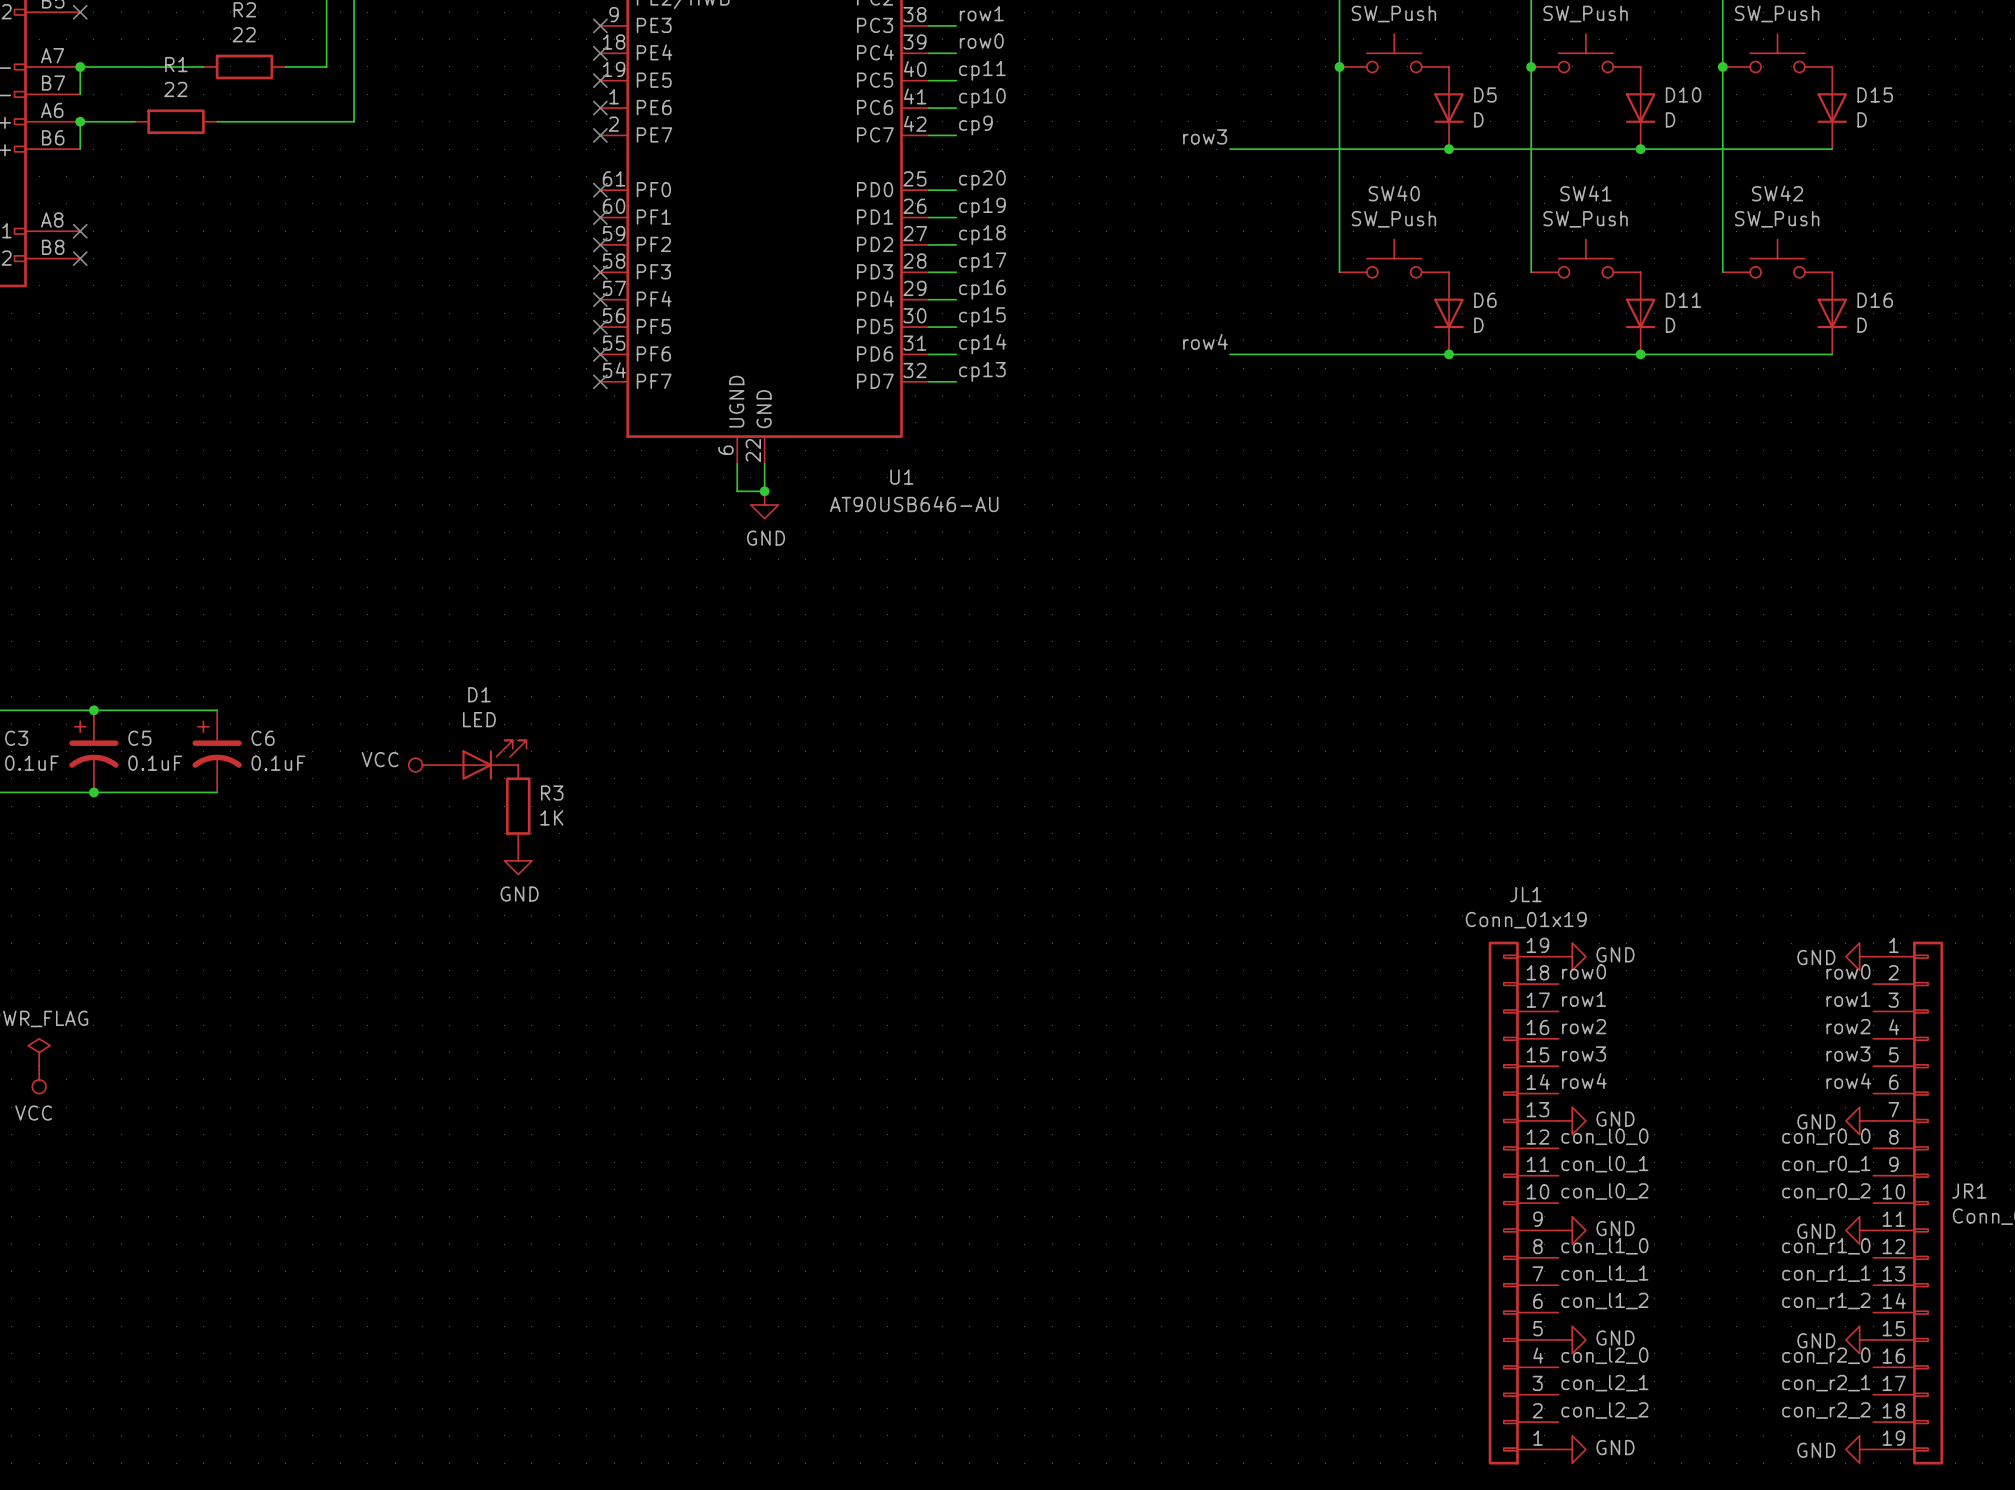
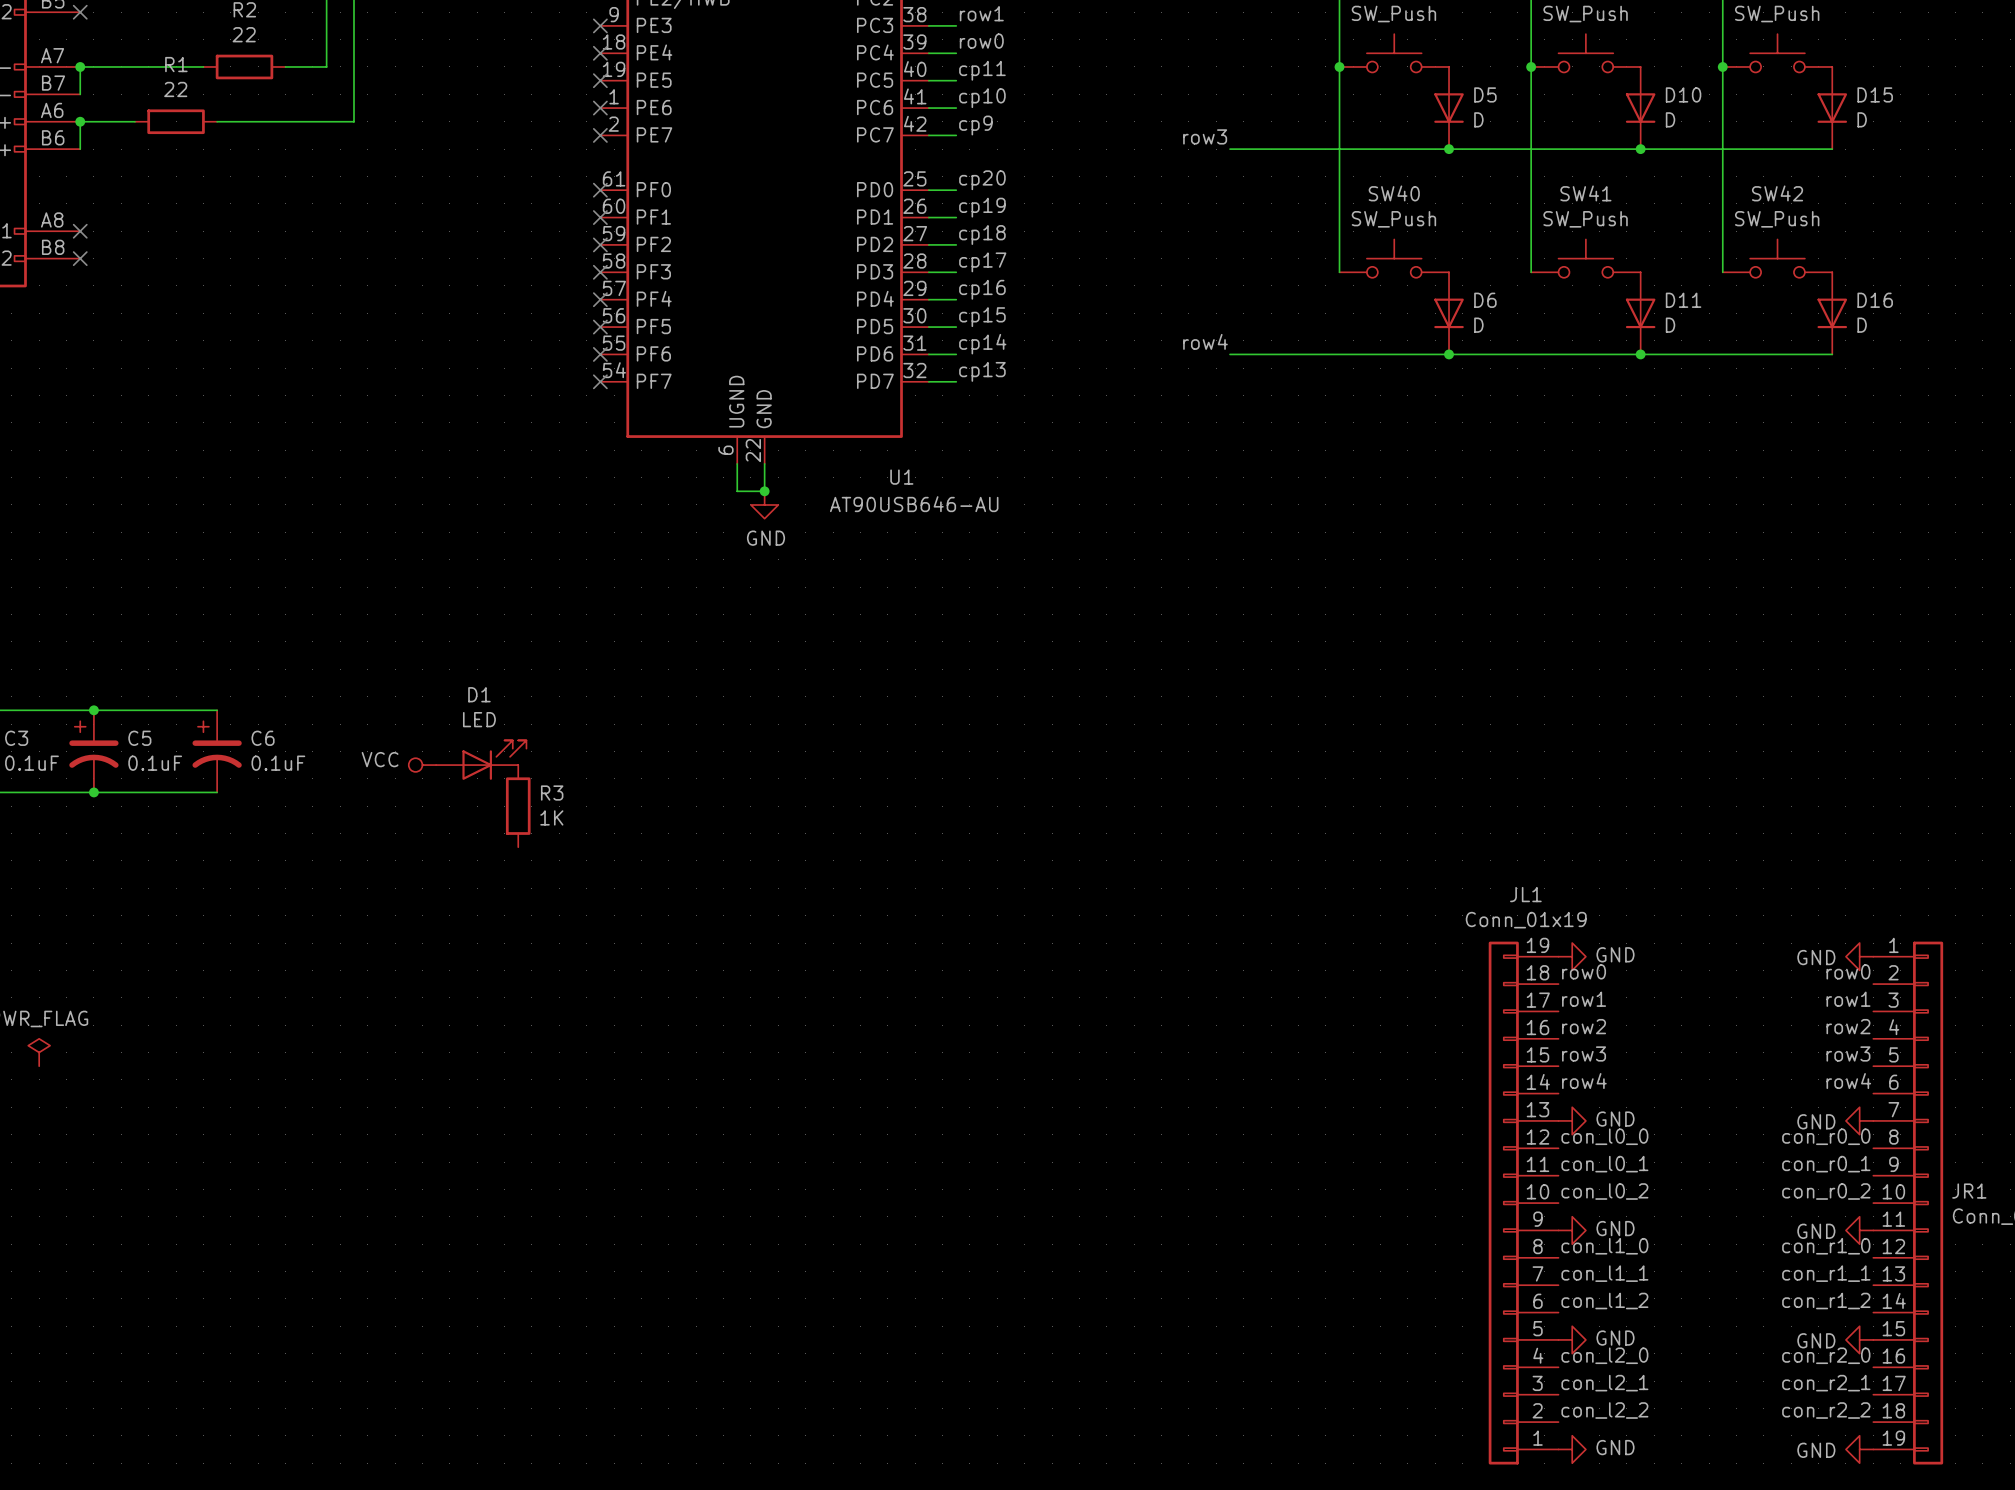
power symbol: GND (518, 860) -> none
power symbol: VCC (39, 1079) -> none

